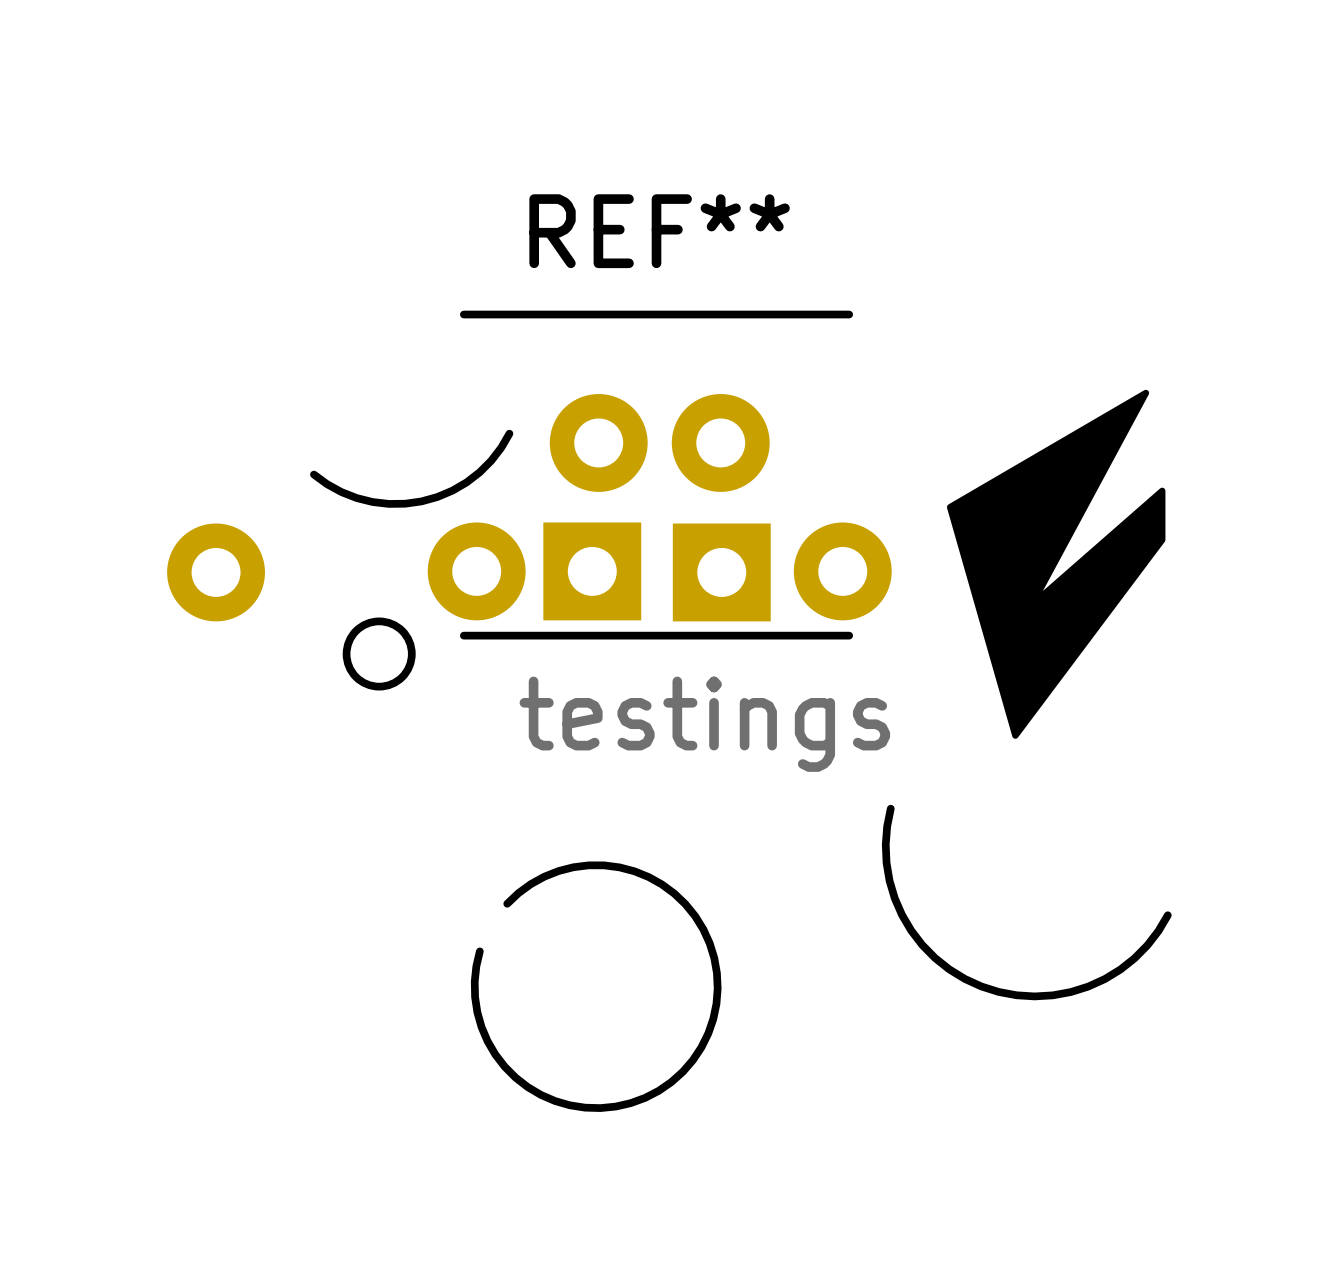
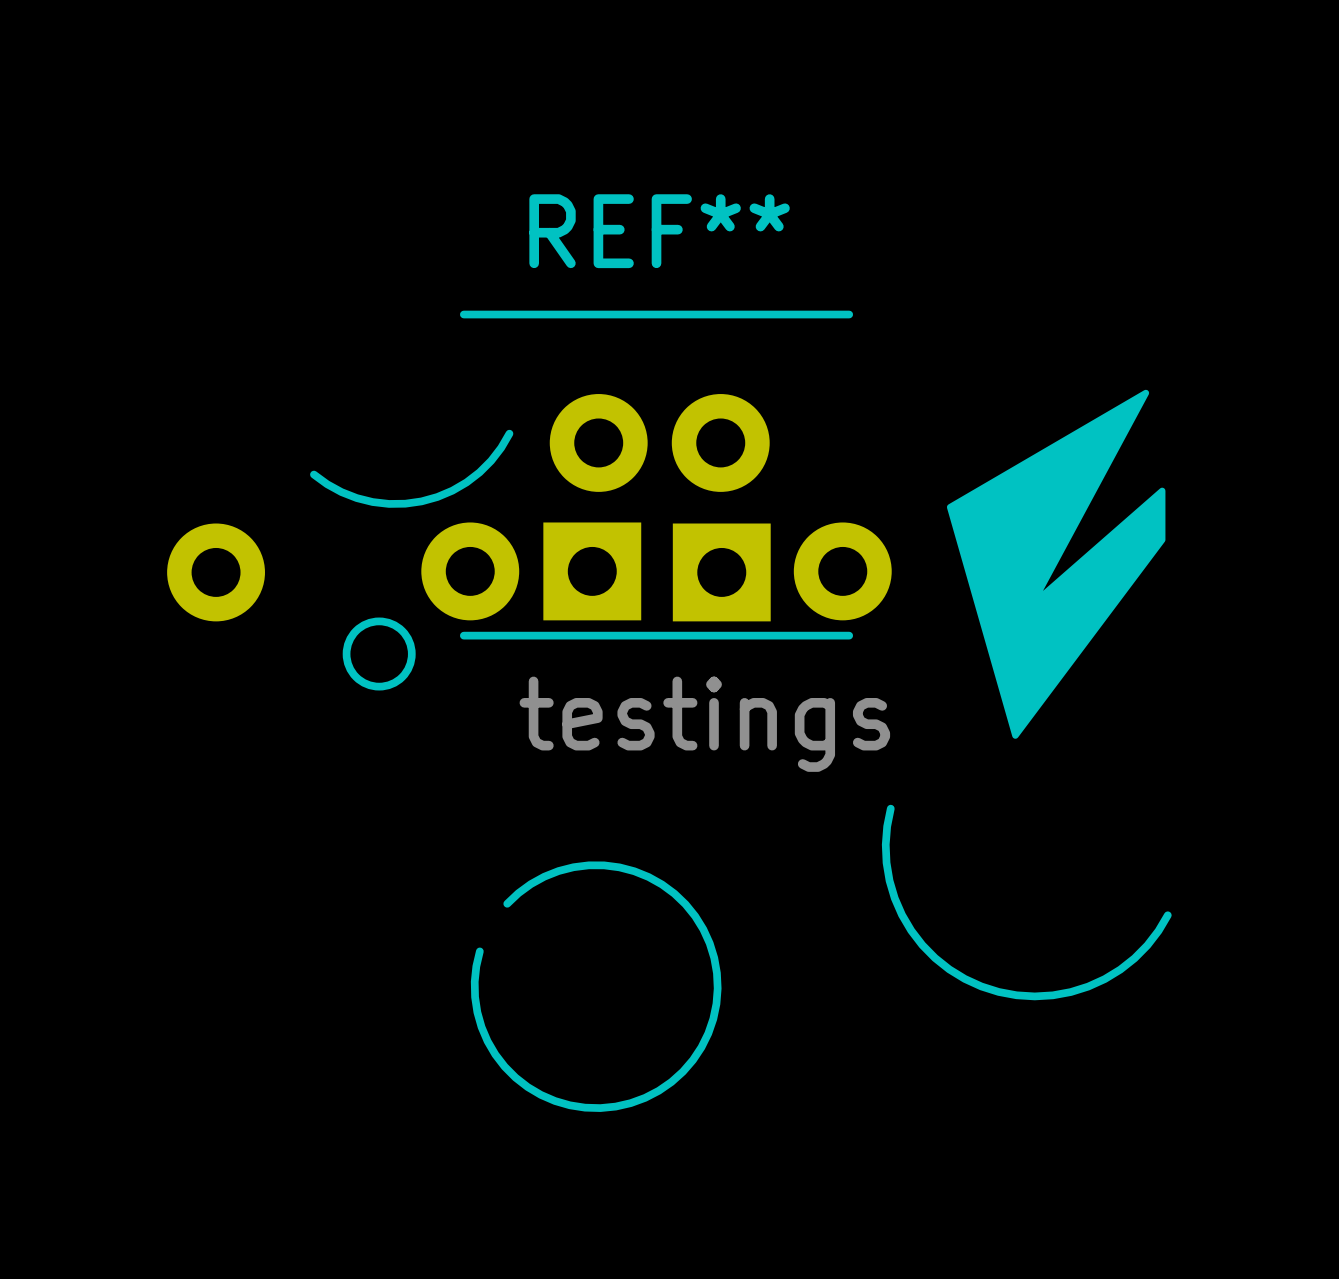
REF** footprint: [167, 310, 1172, 1112] -> [167, 310, 1172, 1112]

